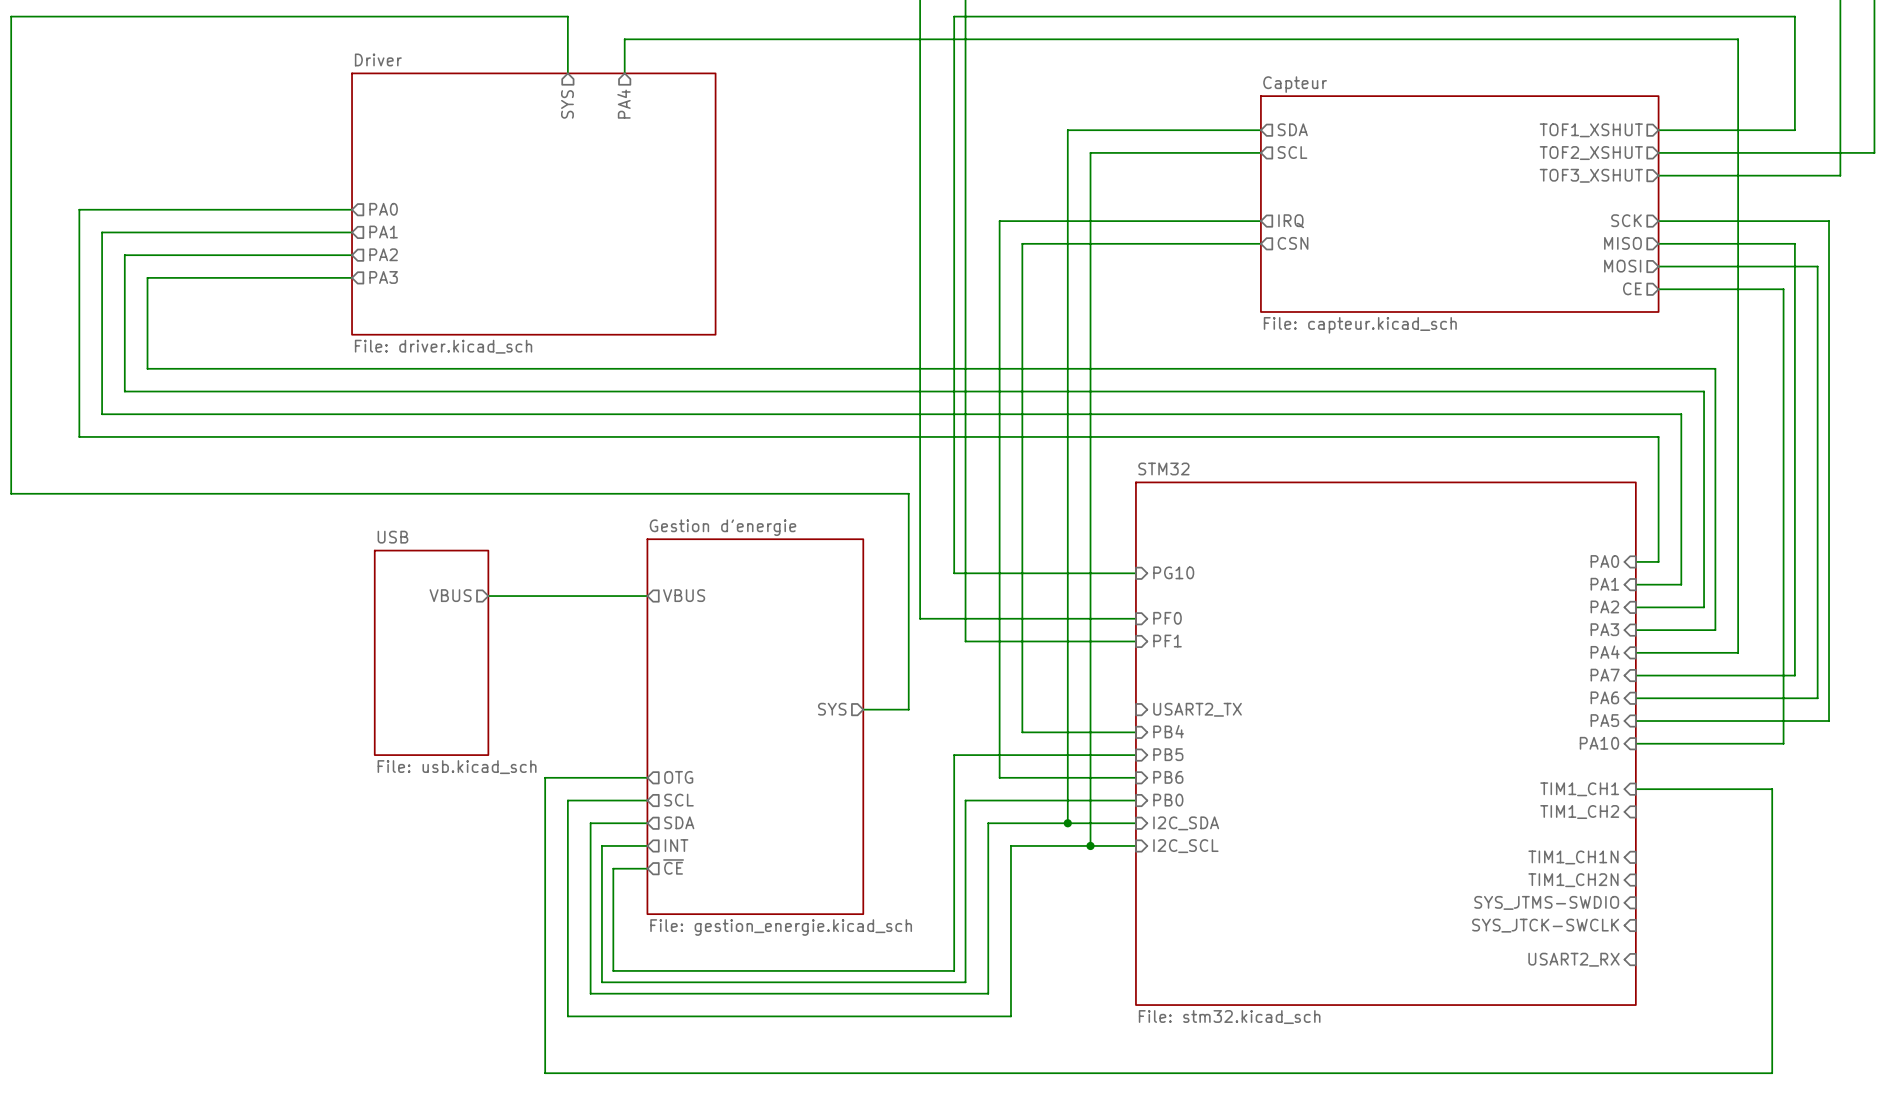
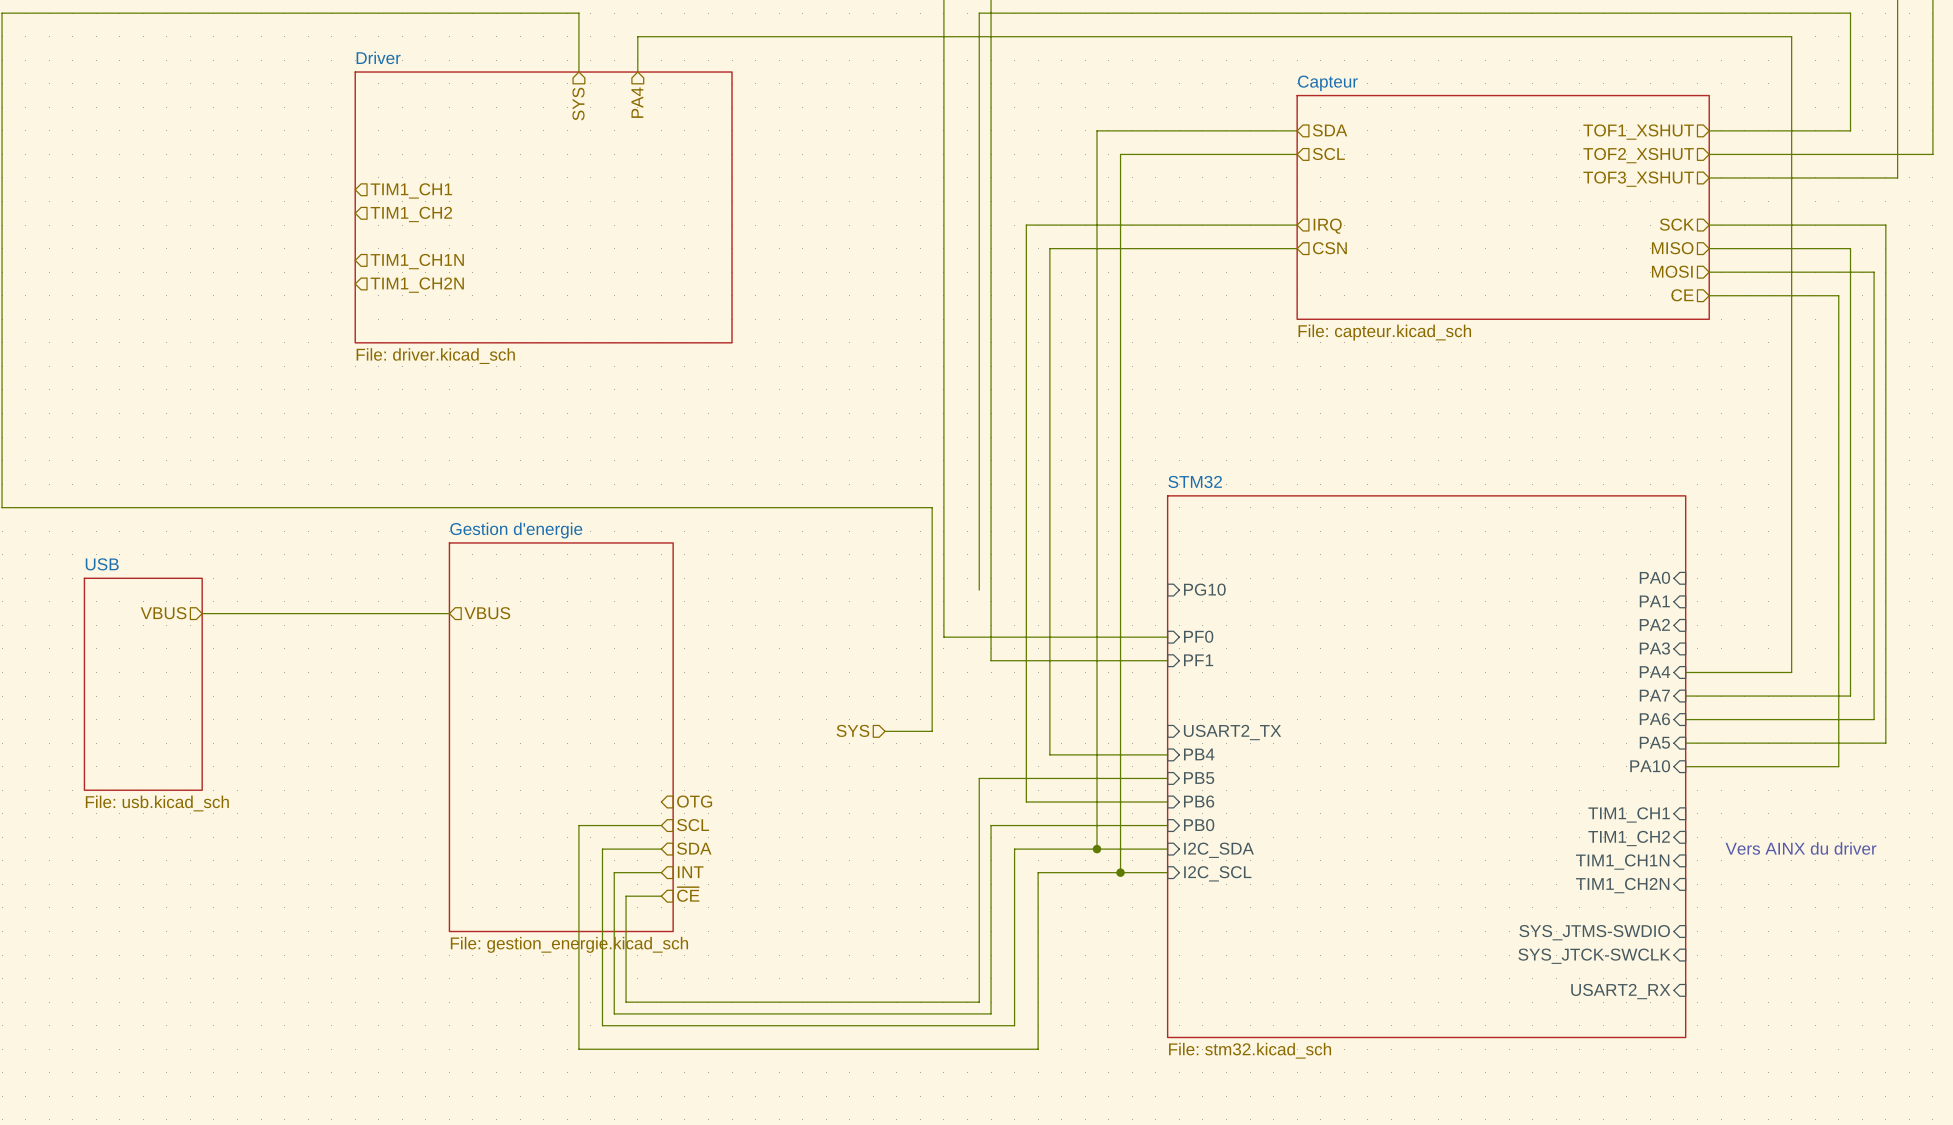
hierarchical label: none -> TIM1_CH1 (411, 190)
wire: (352, 209) (79, 209) (79, 436) (1658, 436) (1658, 561) (1635, 561) -> none
hierarchical label: PA0 (383, 209) -> TIM1_CH2 (411, 214)
wire: (352, 232) (102, 232) (102, 414) (1681, 414) (1681, 584) (1635, 584) -> none
hierarchical label: PA1 (383, 232) -> none
hierarchical label: PA2 (383, 254) -> TIM1_CH1N (417, 261)
wire: (352, 255) (124, 255) (124, 391) (1704, 391) (1704, 607) (1635, 607) -> none
wire: (352, 277) (147, 277) (147, 368) (1715, 368) (1715, 630) (1635, 630) -> none
hierarchical label: PA3 (383, 277) -> TIM1_CH2N (417, 285)
wire: (954, 573) (1135, 573) -> none
hierarchical label: none -> VBUS (163, 613)
hierarchical label rotation: 0° (450, 595) -> 180° (487, 613)
hierarchical label: VBUS (684, 595) -> none
wire: none -> (202, 613) (449, 613)
wire: (488, 596) (647, 596) -> none
sheet USB: File: usb.kicad_sch (431, 652) -> none
sheet USB: none -> File: usb.kicad_sch (143, 684)
sheet Gestion d'energie position: (755, 726) -> (561, 737)
wire: (647, 777) (545, 777) (545, 1073) (1772, 1073) (1772, 789) (1635, 789) -> none
text: none -> Vers AINX du driver (1800, 848)
sheet pin: none -> TIM1_CH1N (1622, 862)
sheet pin: TIM1_CH1N (1573, 857) -> TIM1_CH2N (1622, 885)
sheet pin: TIM1_CH2N (1573, 880) -> none

